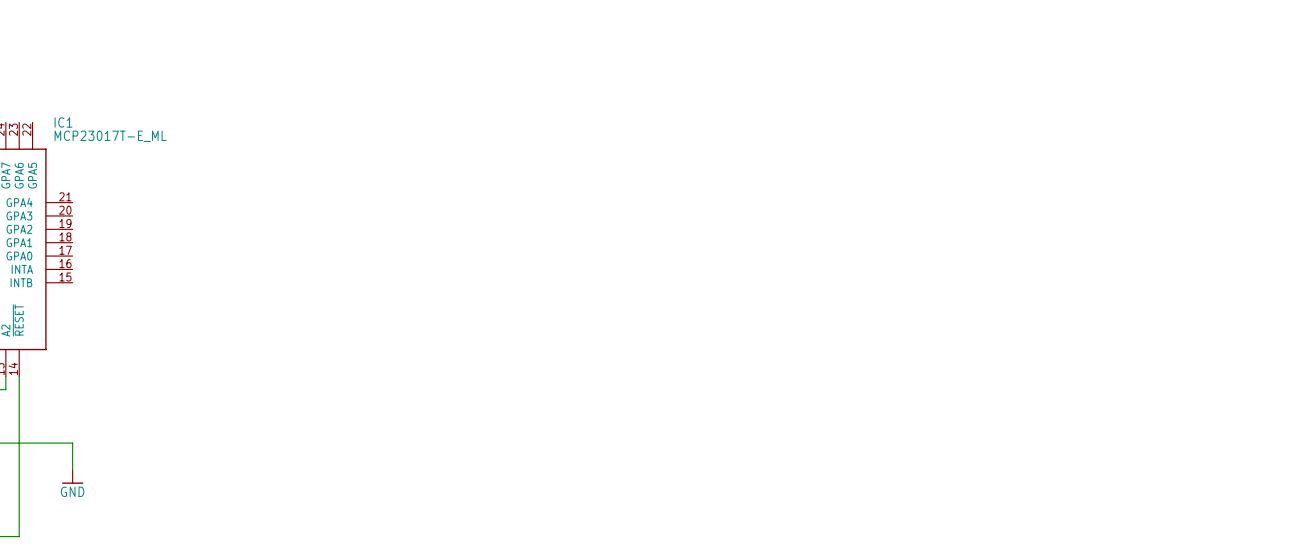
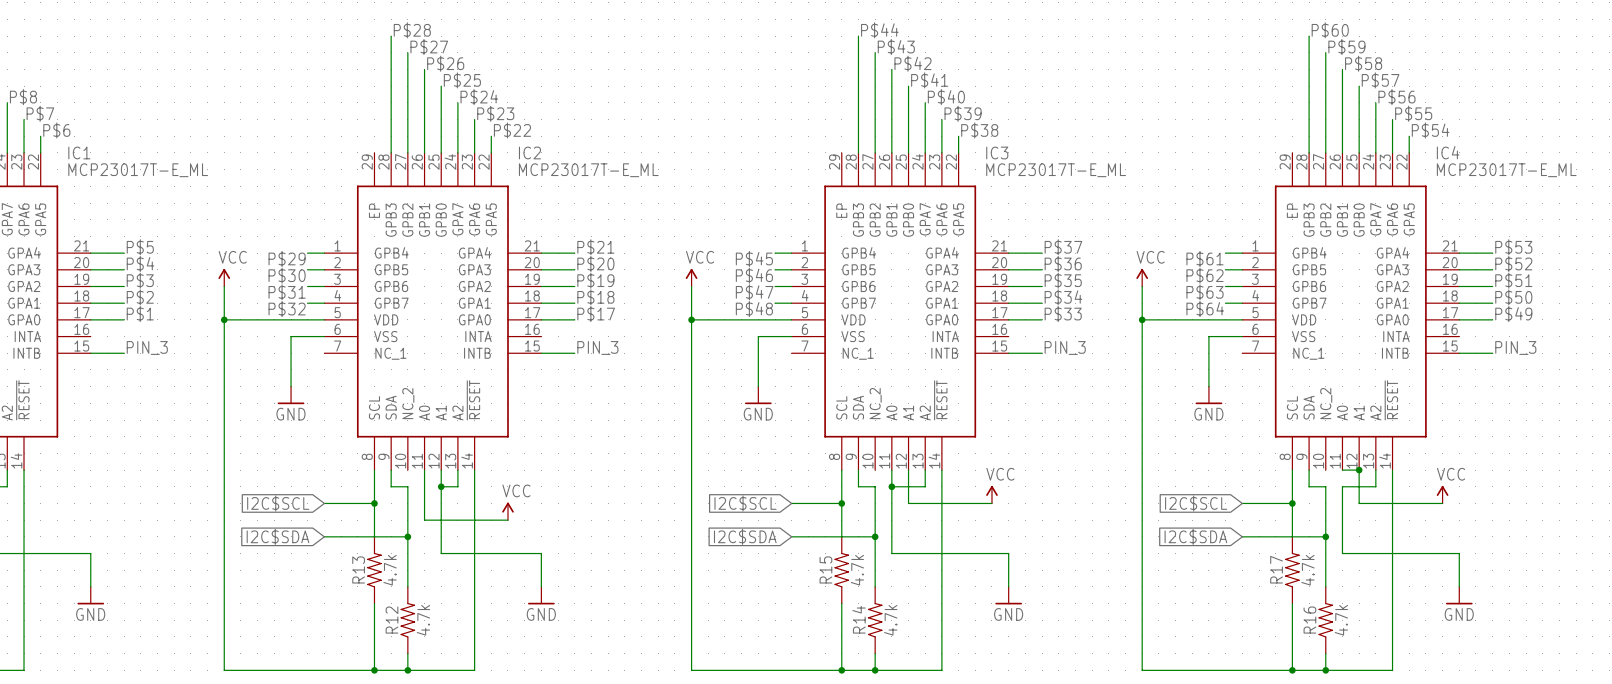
label: none -> P$28 (412, 30)
label: none -> P$44 (879, 30)
label: none -> P$60 (1330, 30)
wire: none -> (391, 36) (391, 152)
wire: none -> (858, 36) (858, 152)
wire: none -> (1309, 36) (1309, 152)
label: none -> P$27 (429, 47)
label: none -> P$43 (896, 47)
label: none -> P$59 (1346, 47)
wire: none -> (407, 52) (407, 152)
wire: none -> (875, 52) (875, 152)
wire: none -> (1325, 52) (1325, 152)
label: none -> P$26 (445, 63)
label: none -> P$42 (912, 63)
label: none -> P$58 (1363, 63)
wire: none -> (424, 69) (424, 152)
wire: none -> (891, 69) (891, 152)
wire: none -> (1342, 69) (1342, 152)
label: none -> P$25 (462, 80)
label: none -> P$41 (929, 80)
label: none -> P$57 (1380, 80)
wire: none -> (441, 86) (441, 152)
wire: none -> (908, 86) (908, 152)
wire: none -> (1359, 86) (1359, 152)
label: none -> P$8 (23, 97)
label: none -> P$24 (479, 97)
label: none -> P$40 (946, 97)
label: none -> P$56 (1396, 97)
wire: none -> (7, 102) (7, 152)
wire: none -> (457, 102) (457, 152)
wire: none -> (925, 102) (925, 152)
wire: none -> (1375, 102) (1375, 152)
label: none -> P$7 (40, 113)
label: none -> P$23 (495, 113)
label: none -> P$39 (963, 113)
label: none -> P$55 (1413, 113)
wire: none -> (24, 119) (24, 152)
wire: none -> (474, 119) (474, 152)
wire: none -> (941, 119) (941, 152)
wire: none -> (1392, 119) (1392, 152)
label: none -> P$6 (56, 130)
label: none -> P$22 (512, 130)
label: none -> P$38 (979, 130)
label: none -> P$54 (1430, 130)
wire: none -> (40, 136) (40, 152)
wire: none -> (491, 136) (491, 152)
wire: none -> (958, 136) (958, 152)
wire: none -> (1409, 136) (1409, 152)
label: none -> P$5 (140, 247)
label: none -> P$21 (595, 247)
label: none -> P$37 (1063, 247)
label: none -> P$53 (1513, 247)
wire: none -> (90, 253) (124, 253)
wire: none -> (307, 253) (324, 253)
wire: none -> (541, 253) (574, 253)
wire: none -> (775, 253) (791, 253)
wire: none -> (1008, 253) (1042, 253)
wire: none -> (1225, 253) (1242, 253)
wire: none -> (1459, 253) (1492, 253)
label: none -> P$29 (287, 258)
label: none -> P$45 (754, 258)
label: none -> P$61 (1204, 258)
label: none -> P$4 (140, 263)
label: none -> P$20 (595, 263)
label: none -> P$36 (1063, 263)
label: none -> P$52 (1513, 263)
wire: none -> (90, 269) (124, 269)
wire: none -> (307, 269) (324, 269)
wire: none -> (541, 269) (574, 269)
wire: none -> (775, 269) (791, 269)
wire: none -> (1008, 269) (1042, 269)
wire: none -> (1225, 269) (1242, 269)
wire: none -> (1459, 269) (1492, 269)
label: none -> P$30 (287, 275)
label: none -> P$46 (754, 275)
label: none -> P$62 (1204, 275)
power symbol: none -> VCC (224, 277)
power symbol: none -> VCC (691, 277)
power symbol: none -> VCC (1142, 277)
label: none -> P$3 (140, 280)
label: none -> P$19 (595, 280)
label: none -> P$35 (1063, 280)
label: none -> P$51 (1513, 280)
wire: none -> (90, 286) (124, 286)
wire: none -> (224, 286) (224, 670) (474, 670) (474, 470)
wire: none -> (307, 286) (324, 286)
wire: none -> (541, 286) (574, 286)
wire: none -> (691, 286) (691, 670) (941, 670) (941, 470)
wire: none -> (775, 286) (791, 286)
wire: none -> (1008, 286) (1042, 286)
wire: none -> (1142, 286) (1142, 670) (1392, 670) (1392, 470)
wire: none -> (1225, 286) (1242, 286)
wire: none -> (1459, 286) (1492, 286)
label: none -> P$31 (287, 292)
label: none -> P$47 (754, 292)
label: none -> P$63 (1204, 292)
label: none -> P$2 (140, 297)
label: none -> P$18 (595, 297)
label: none -> P$34 (1063, 297)
label: none -> P$50 (1513, 297)
wire: none -> (90, 303) (124, 303)
wire: none -> (307, 303) (324, 303)
wire: none -> (541, 303) (574, 303)
wire: none -> (775, 303) (791, 303)
wire: none -> (1008, 303) (1042, 303)
wire: none -> (1225, 303) (1242, 303)
wire: none -> (1459, 303) (1492, 303)
label: none -> P$32 (287, 309)
label: none -> P$48 (754, 309)
label: none -> P$64 (1205, 309)
IC2: none -> MCP23017T-E_ML (432, 311)
IC3: none -> MCP23017T-E_ML (900, 311)
IC4: none -> MCP23017T-E_ML (1350, 311)
label: none -> P$1 (140, 314)
label: none -> P$17 (596, 314)
label: none -> P$33 (1063, 314)
label: none -> P$49 (1513, 314)
wire: none -> (90, 319) (124, 319)
wire: none -> (224, 319) (324, 319)
junction: none -> (224, 319)
wire: none -> (541, 319) (574, 319)
wire: none -> (691, 319) (791, 319)
junction: none -> (691, 319)
wire: none -> (1008, 319) (1042, 319)
wire: none -> (1142, 319) (1242, 319)
junction: none -> (1142, 319)
wire: none -> (1459, 319) (1492, 319)
wire: none -> (324, 336) (291, 336) (291, 386)
wire: none -> (791, 336) (758, 336) (758, 386)
wire: none -> (1242, 336) (1208, 336) (1208, 386)
label: none -> PIN_3 (147, 347)
label: none -> PIN_3 (597, 347)
label: none -> PIN_3 (1065, 347)
label: none -> PIN_3 (1515, 347)
wire: none -> (90, 353) (124, 353)
wire: none -> (541, 353) (574, 353)
wire: none -> (1008, 353) (1042, 353)
wire: none -> (1459, 353) (1492, 353)
power symbol: none -> GND (291, 395)
power symbol: none -> GND (758, 395)
power symbol: none -> GND (1208, 395)
wire: none -> (374, 470) (374, 536)
wire: none -> (391, 470) (391, 486) (407, 486) (407, 586)
wire: none -> (424, 470) (424, 520) (507, 520)
wire: none -> (441, 470) (441, 553) (541, 553) (541, 586)
wire: none -> (457, 470) (457, 486) (441, 486)
wire: none -> (841, 470) (841, 536)
wire: none -> (858, 470) (858, 486) (875, 486) (875, 586)
wire: none -> (891, 470) (891, 553) (1008, 553) (1008, 586)
wire: none -> (908, 470) (908, 503) (991, 503)
wire: none -> (925, 470) (925, 486) (891, 486)
wire: none -> (1292, 470) (1292, 536)
wire: none -> (1309, 470) (1309, 486) (1325, 486) (1325, 586)
wire: none -> (1342, 470) (1359, 470) (1359, 503) (1442, 503)
junction: none -> (1359, 470)
wire: none -> (1375, 470) (1375, 486) (1342, 486) (1342, 553) (1459, 553) (1459, 586)
junction: none -> (441, 486)
junction: none -> (891, 486)
power symbol: none -> VCC (991, 494)
power symbol: none -> VCC (1442, 494)
global label: none -> I2C$SCL (278, 503)
wire: none -> (324, 503) (374, 503)
junction: none -> (374, 503)
global label: none -> I2C$SCL (745, 503)
wire: none -> (791, 503) (841, 503)
junction: none -> (841, 503)
global label: none -> I2C$SCL (1196, 503)
wire: none -> (1242, 503) (1292, 503)
junction: none -> (1292, 503)
power symbol: none -> VCC (507, 511)
global label: none -> I2C$SDA (277, 536)
wire: none -> (324, 536) (407, 536)
junction: none -> (407, 536)
global label: none -> I2C$SDA (745, 536)
wire: none -> (791, 536) (875, 536)
junction: none -> (875, 536)
global label: none -> I2C$SDA (1195, 536)
wire: none -> (1242, 536) (1325, 536)
junction: none -> (1325, 536)
R13: none -> 4.7k (374, 570)
R15: none -> 4.7k (841, 570)
R17: none -> 4.7k (1292, 570)
power symbol: none -> GND (541, 595)
power symbol: none -> GND (1008, 595)
power symbol: none -> GND (1459, 595)
wire: none -> (374, 603) (374, 670)
wire: none -> (841, 603) (841, 670)
wire: none -> (1292, 603) (1292, 670)
R12: none -> 4.7k (407, 620)
R14: none -> 4.7k (875, 620)
R16: none -> 4.7k (1325, 620)
wire: none -> (407, 653) (407, 670)
wire: none -> (875, 653) (875, 670)
wire: none -> (1325, 653) (1325, 670)
junction: none -> (374, 670)
junction: none -> (407, 670)
junction: none -> (841, 670)
junction: none -> (875, 670)
junction: none -> (1292, 670)
junction: none -> (1325, 670)

